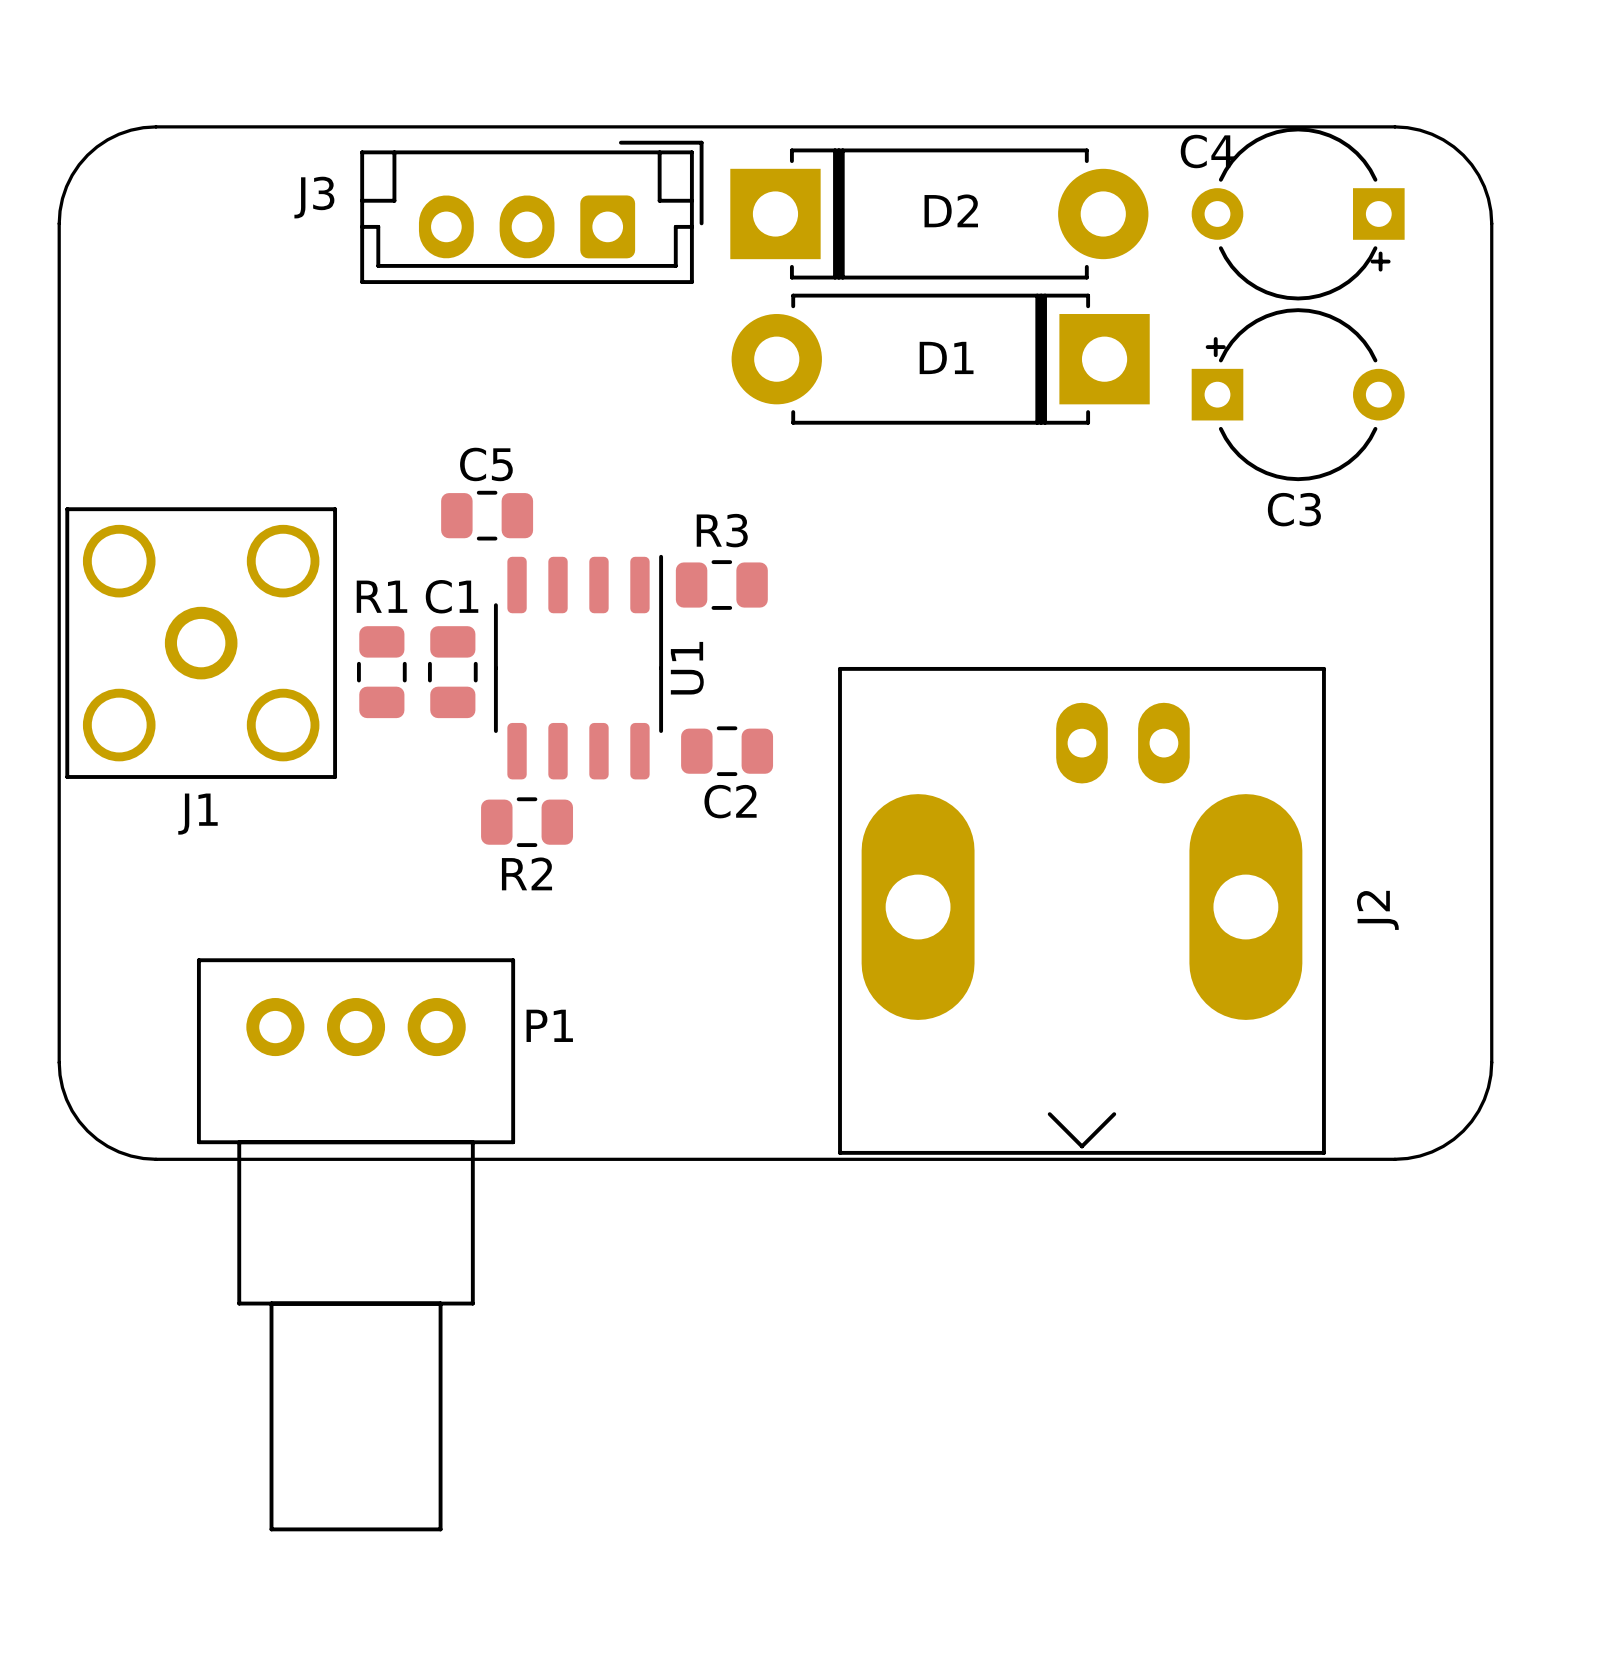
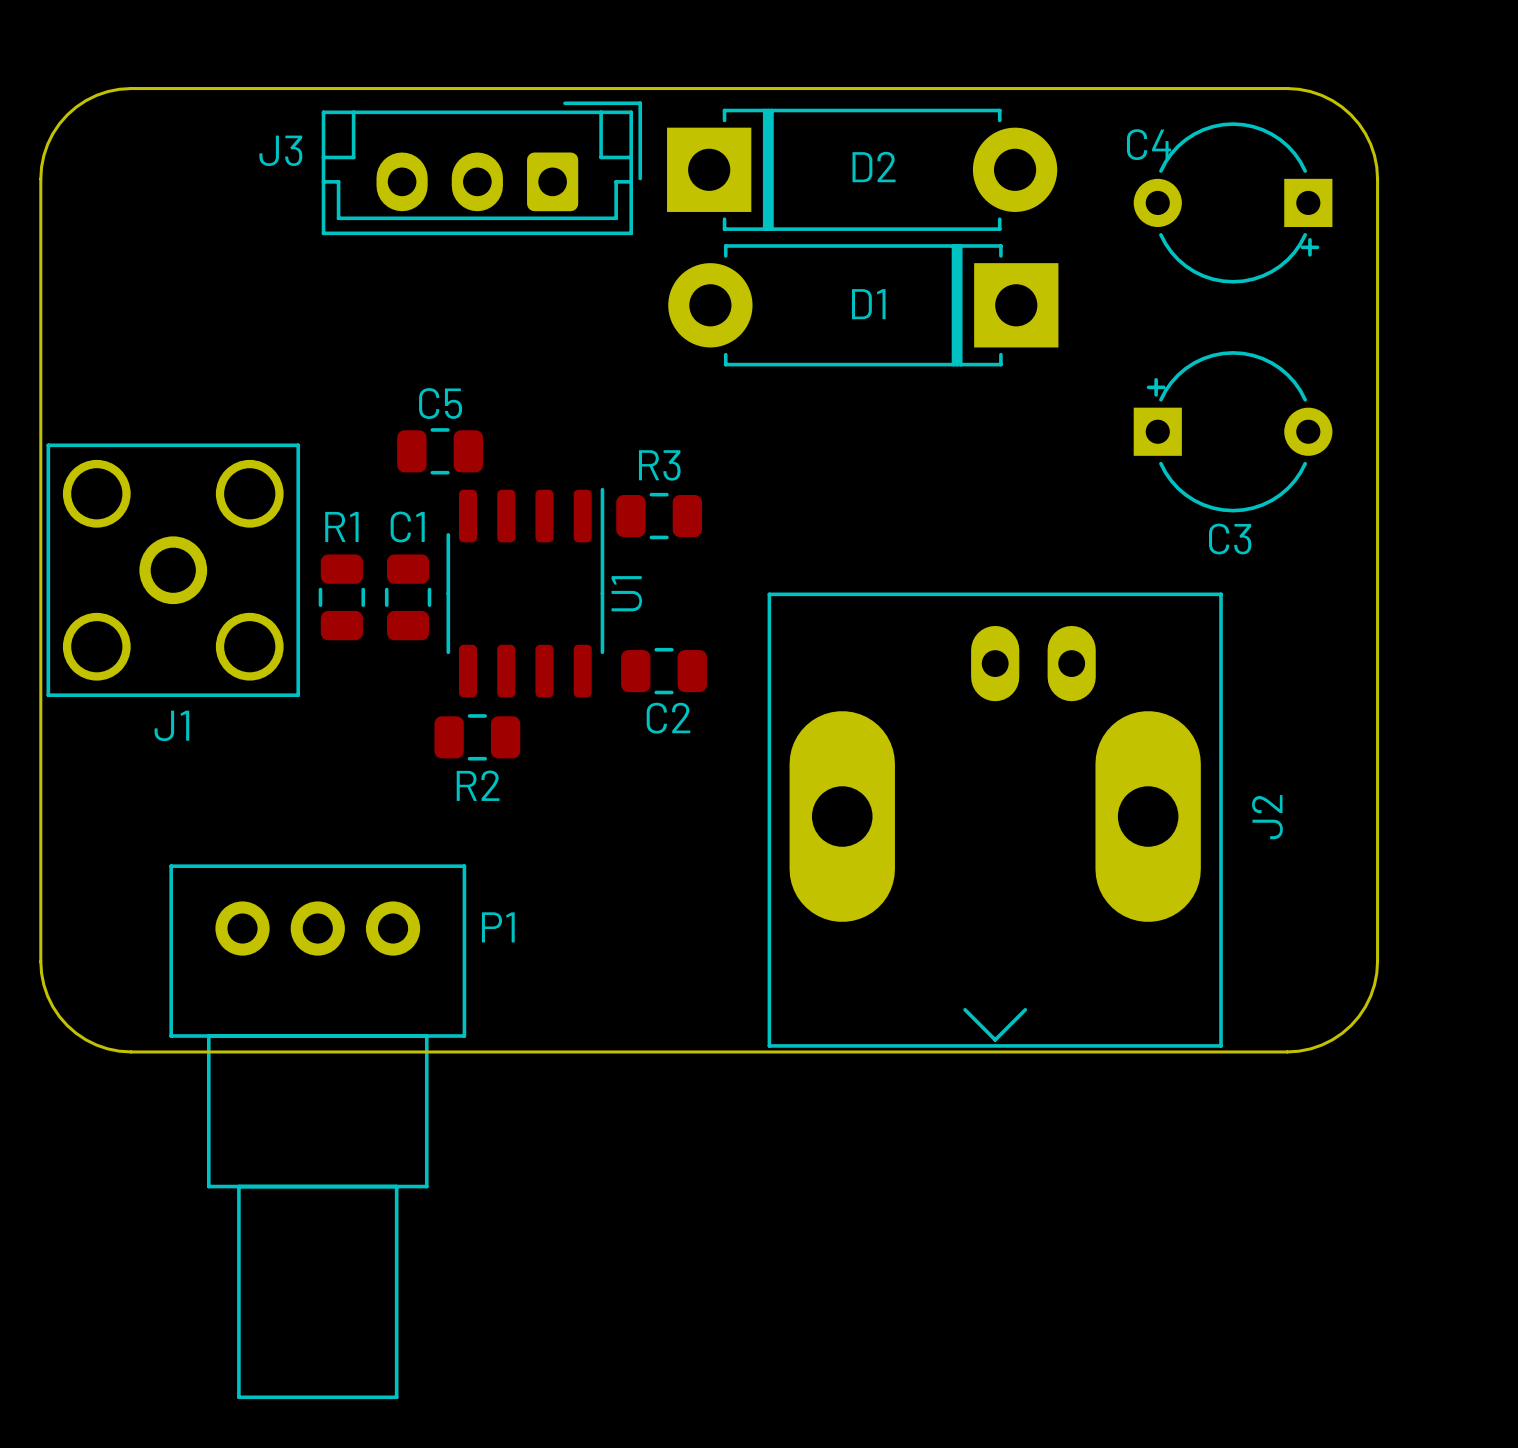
C4 position: (1298, 213) -> (1233, 202)
C3 position: (1298, 394) -> (1233, 431)

